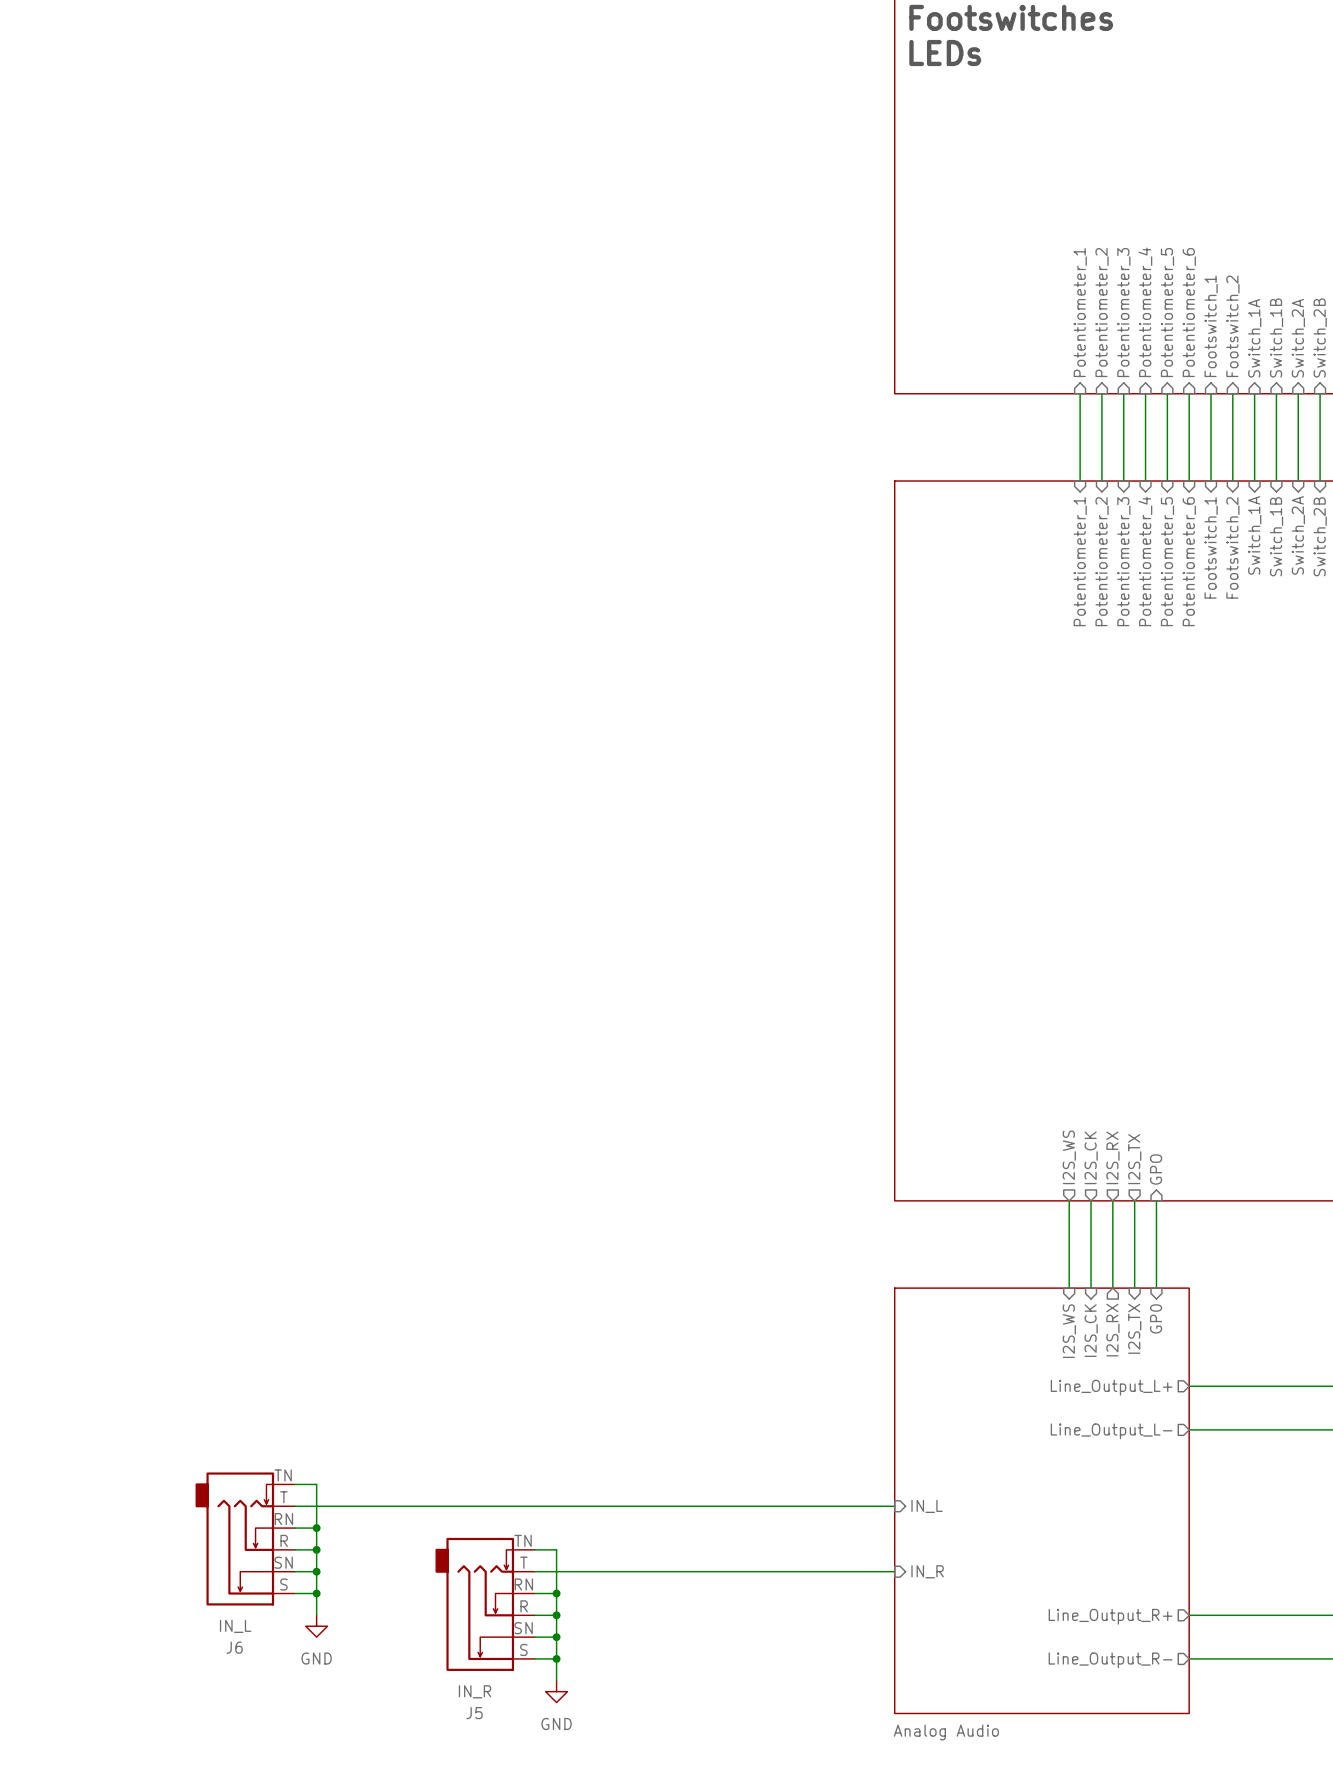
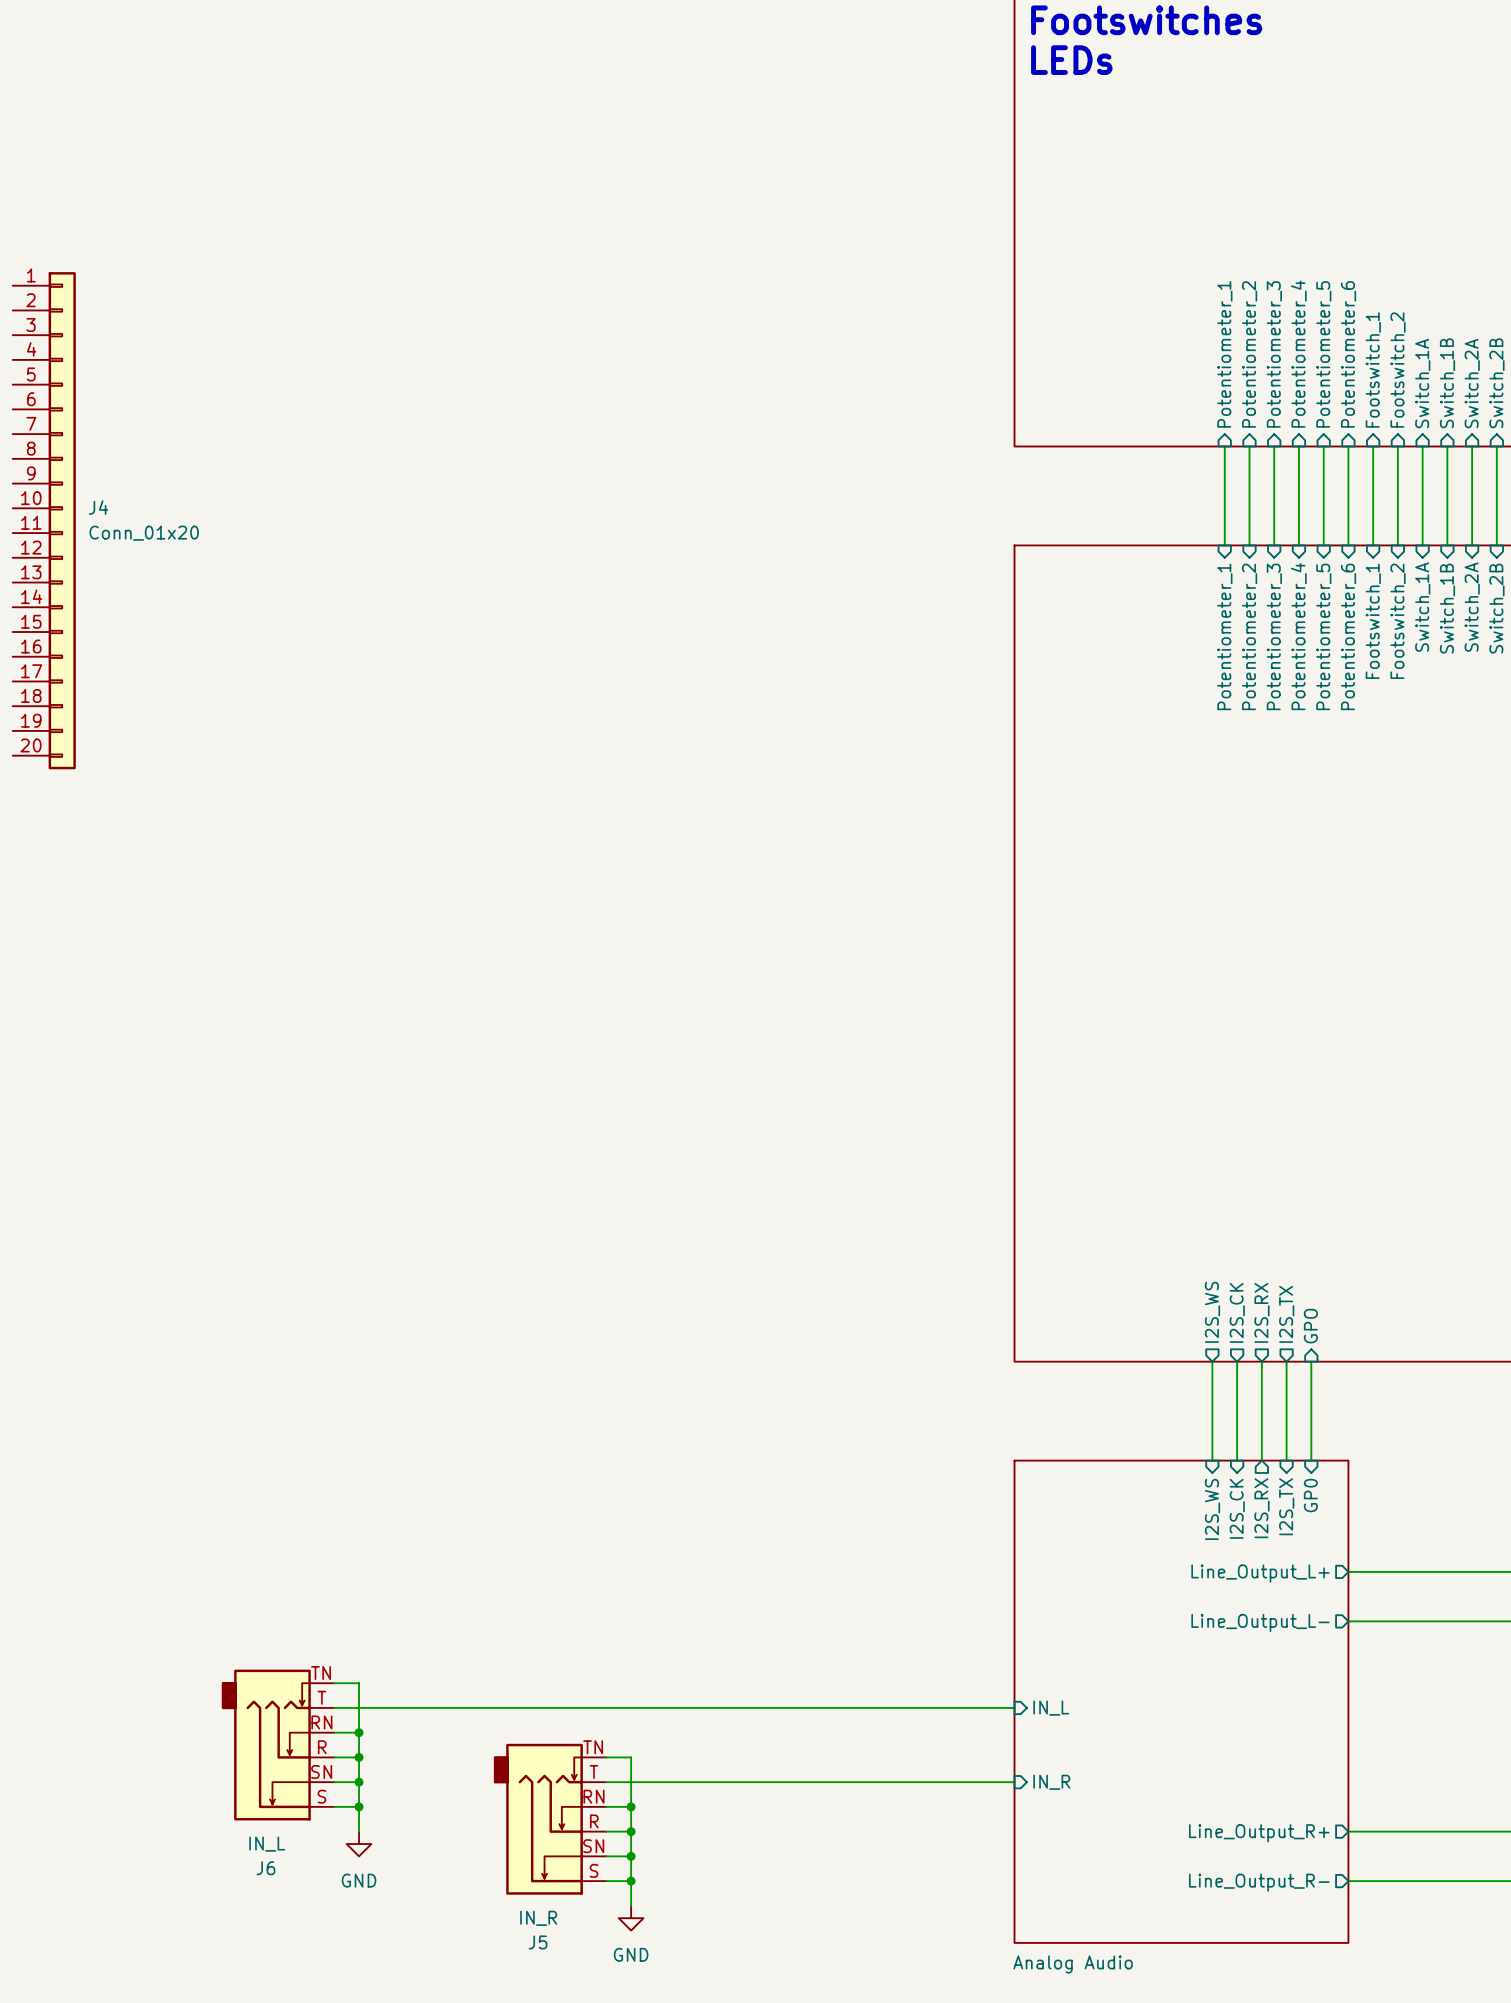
J4: none -> Conn_01x20 (44, 520)

